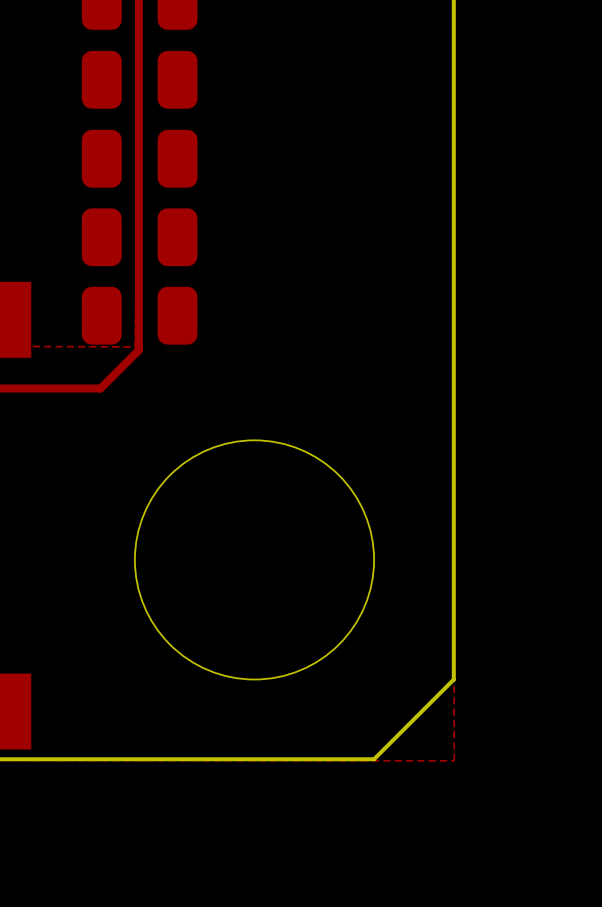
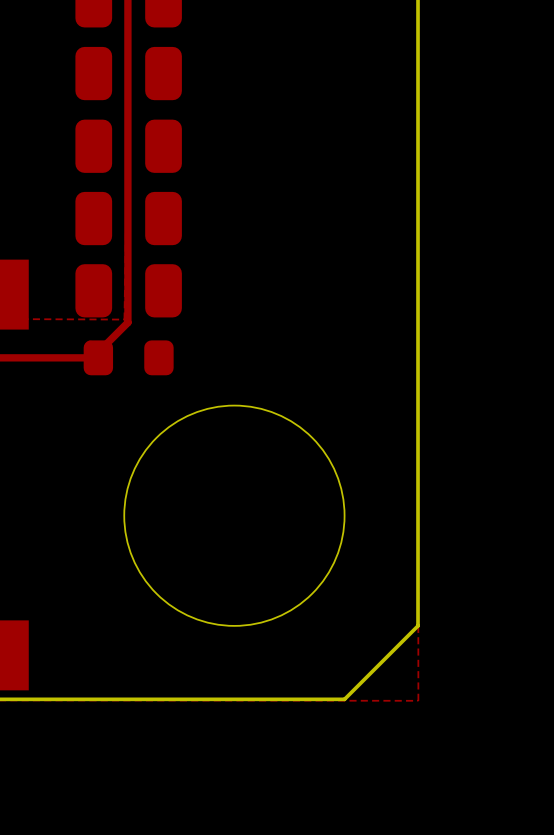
part: none -> (128, 357)

